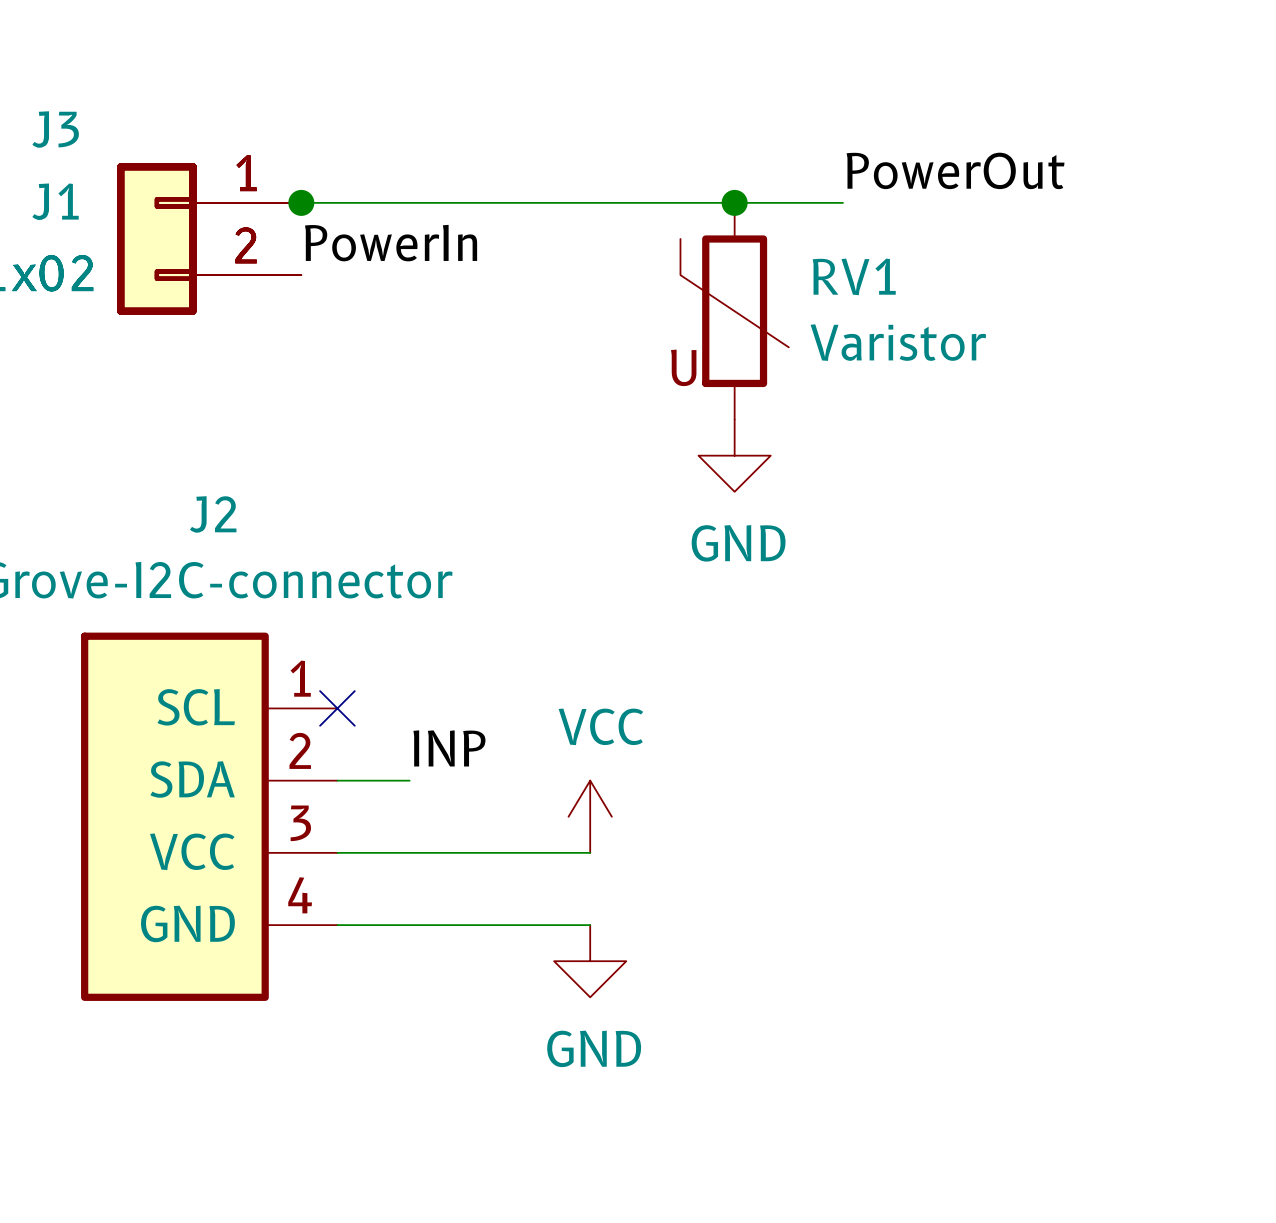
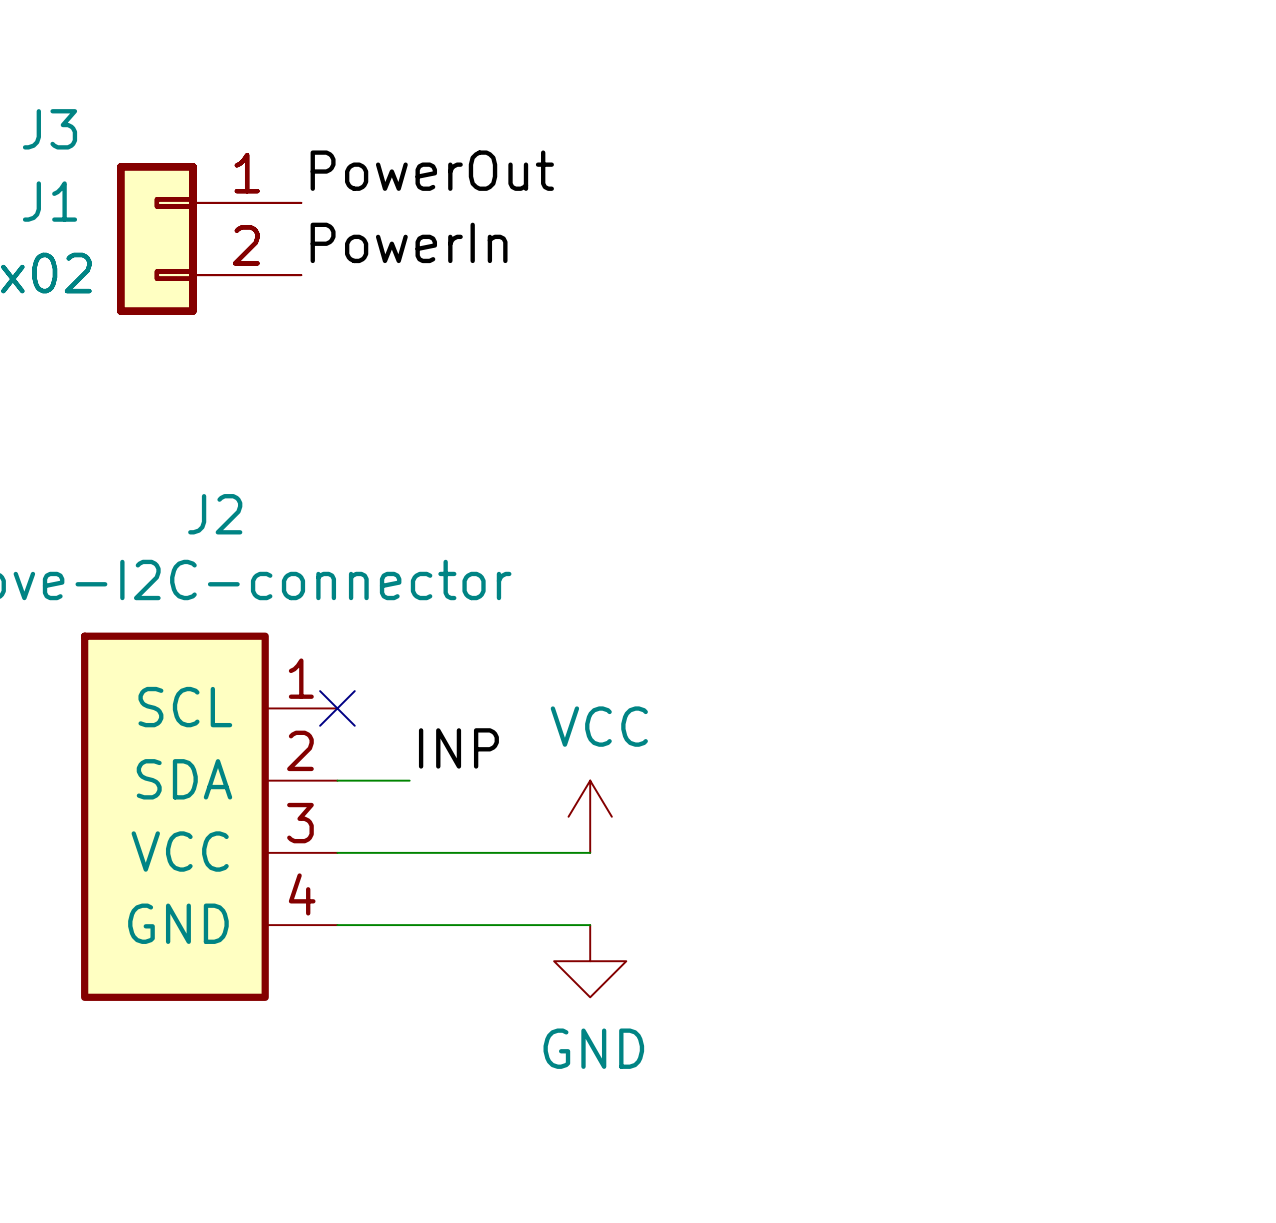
label position: PowerOut (955, 170) -> PowerOut (432, 170)
wire: (301, 202) (842, 202) -> none
junction: (301, 202) -> none
junction: (734, 202) -> none
RV1: Varistor (734, 311) -> none
power symbol: GND (734, 455) -> none

